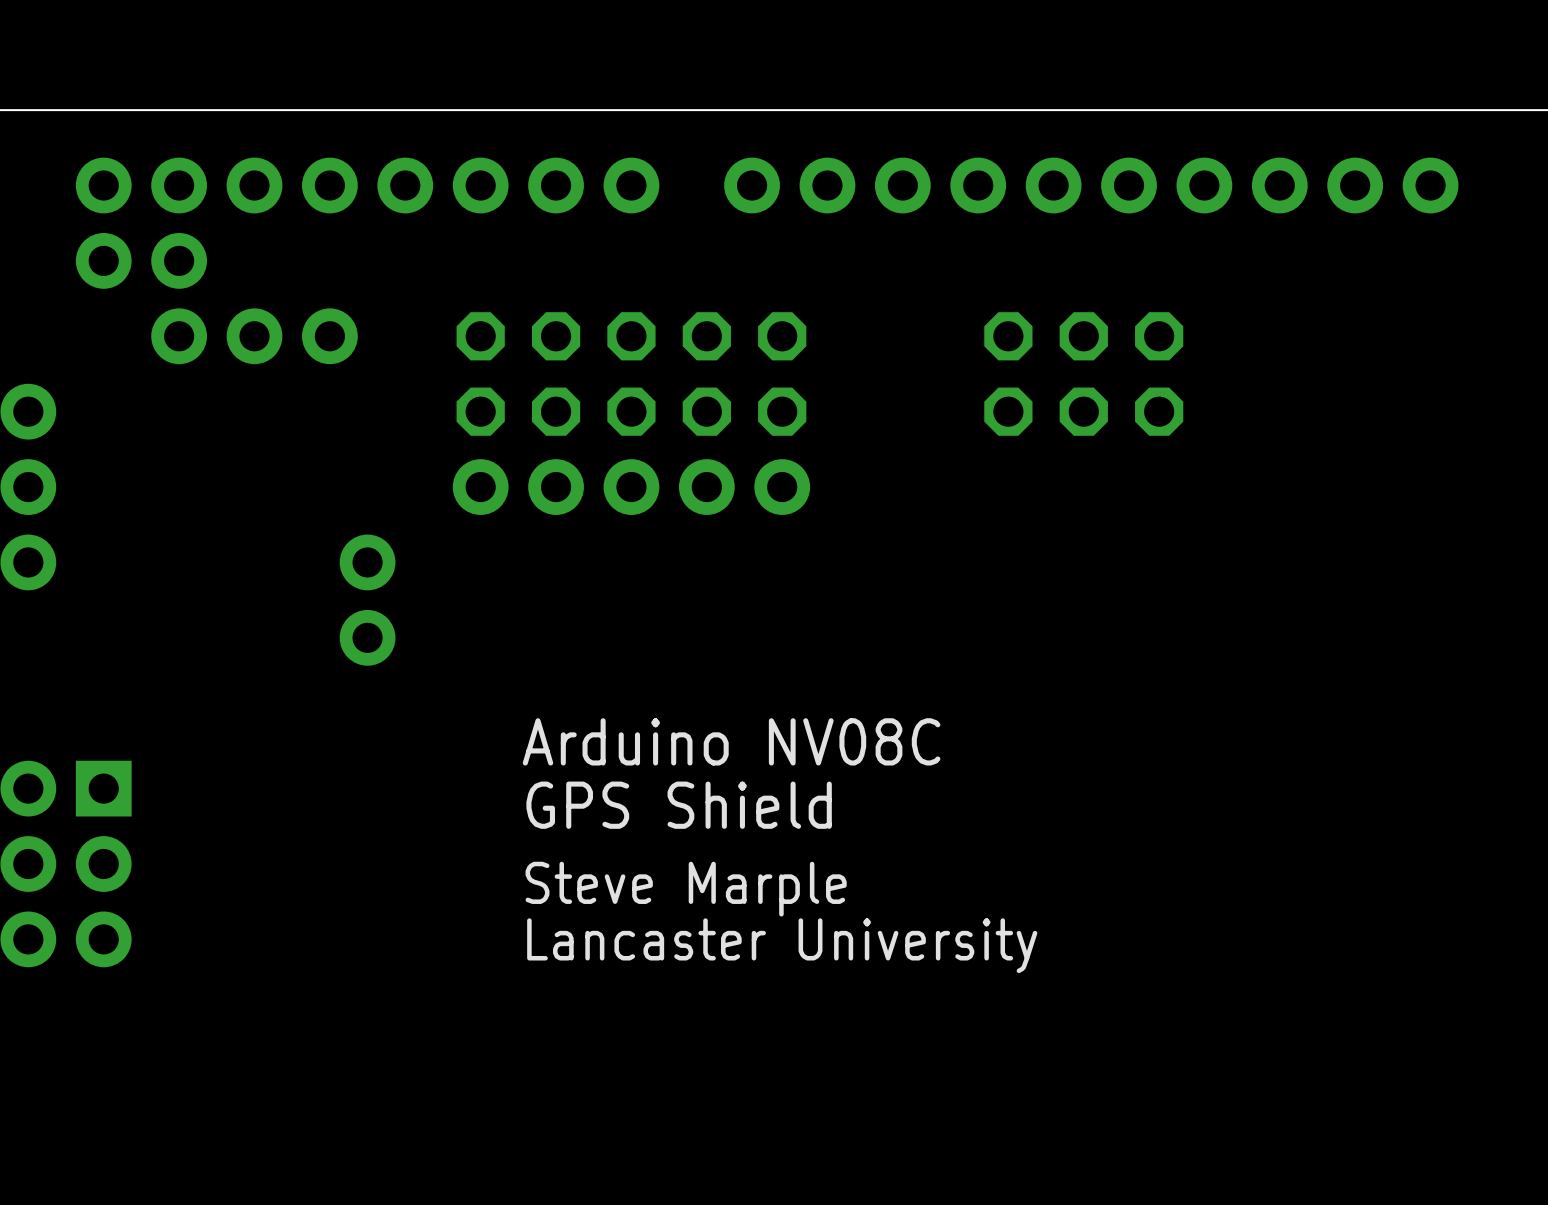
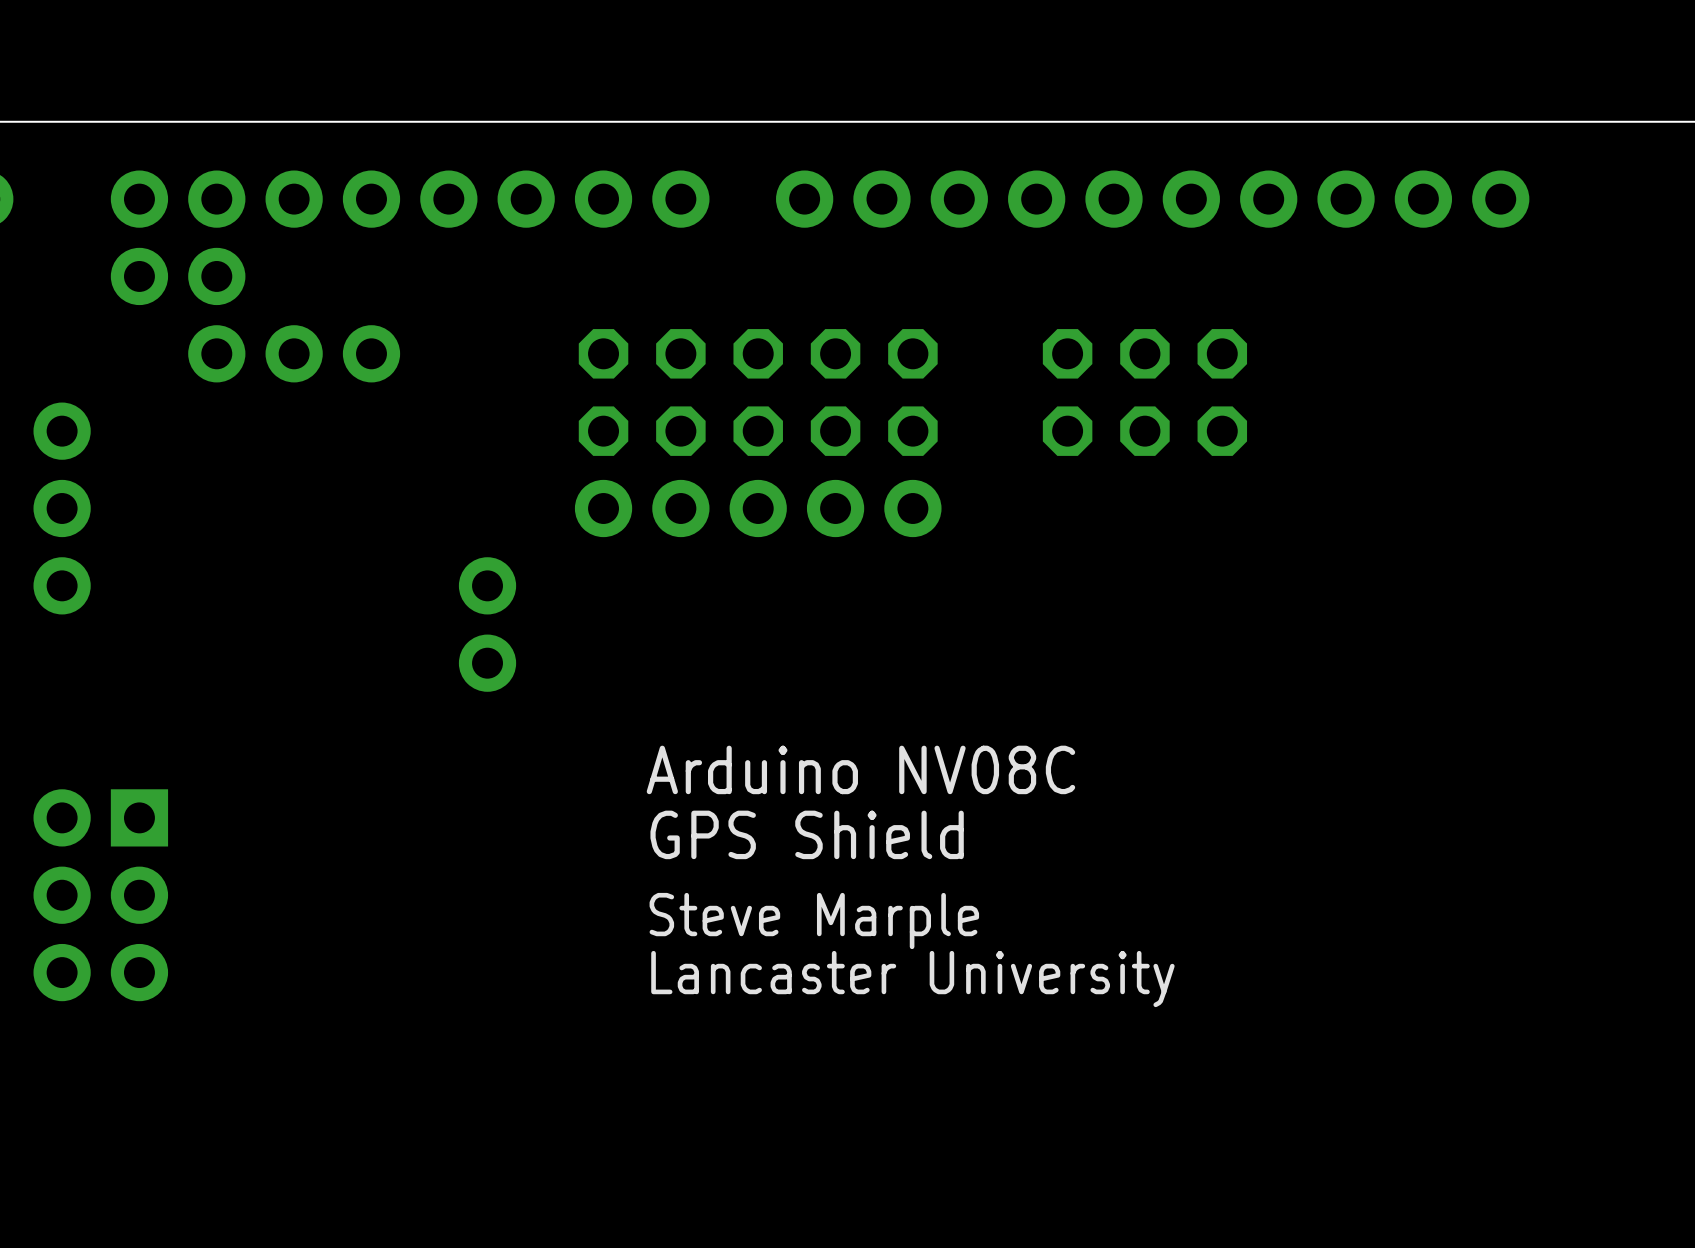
part position: (631, 373) -> (758, 392)
part: (480, 487) -> none
part: none -> (912, 508)
part: (367, 562) -> none
part: none -> (487, 585)
part: (367, 637) -> none
part: none -> (487, 663)
text position: Arduino NV08C (731, 741) -> Arduino NV08C (860, 769)
text position: GPS Shield (679, 805) -> GPS Shield (807, 834)
text position: Steve Marple (686, 889) -> Steve Marple (814, 921)
text position: Lancaster University (782, 945) -> Lancaster University (912, 979)

